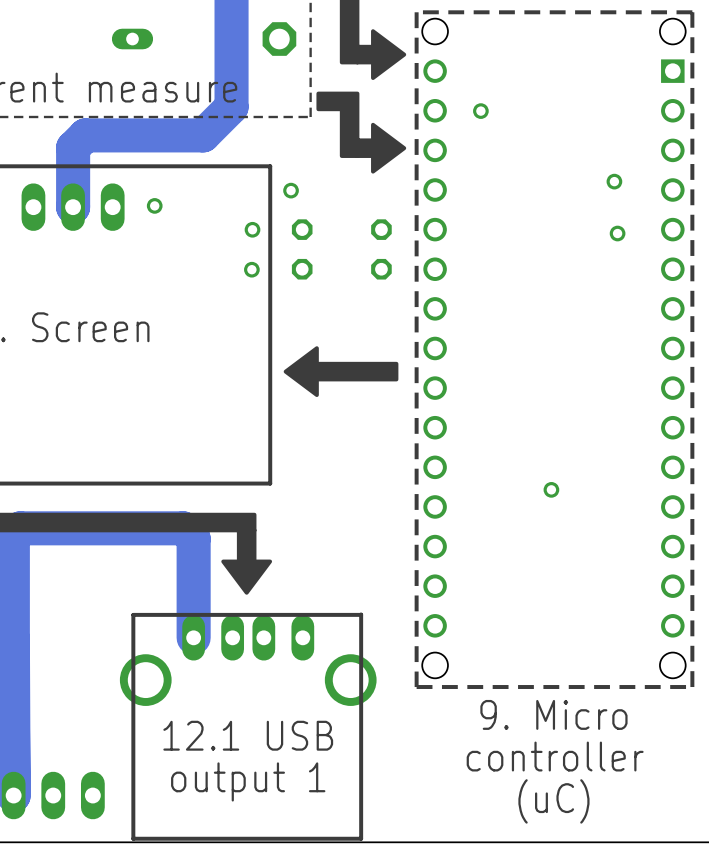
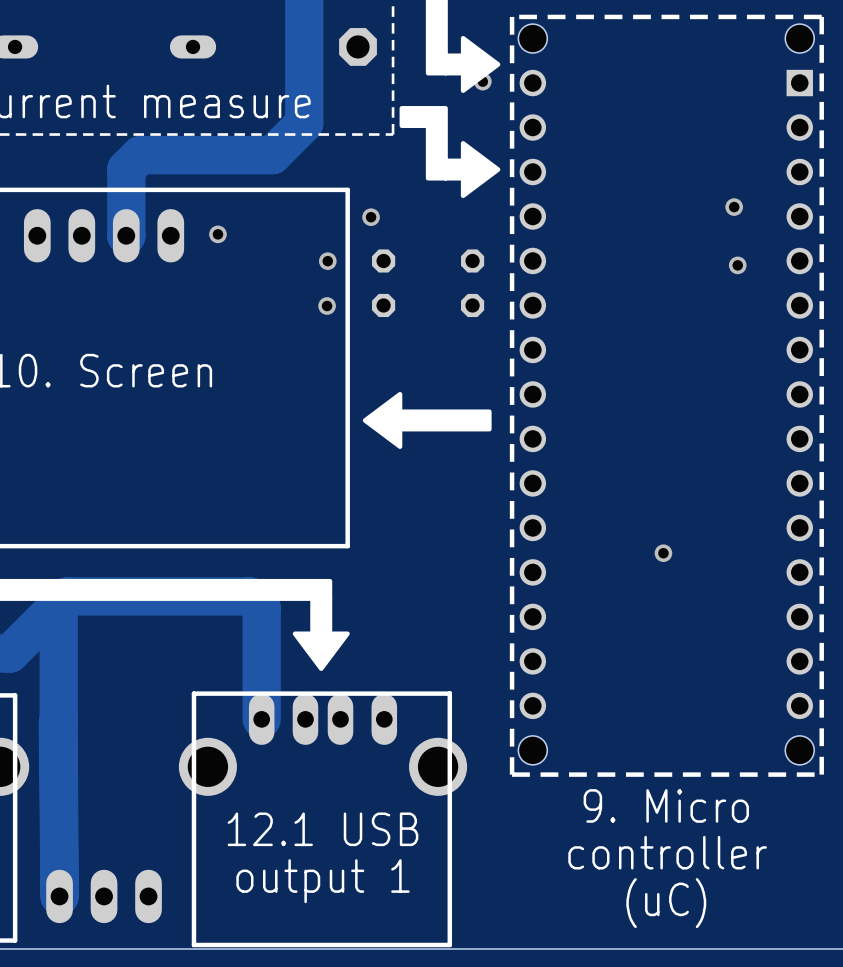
via: none -> (482, 81)
via: (480, 111) -> none

